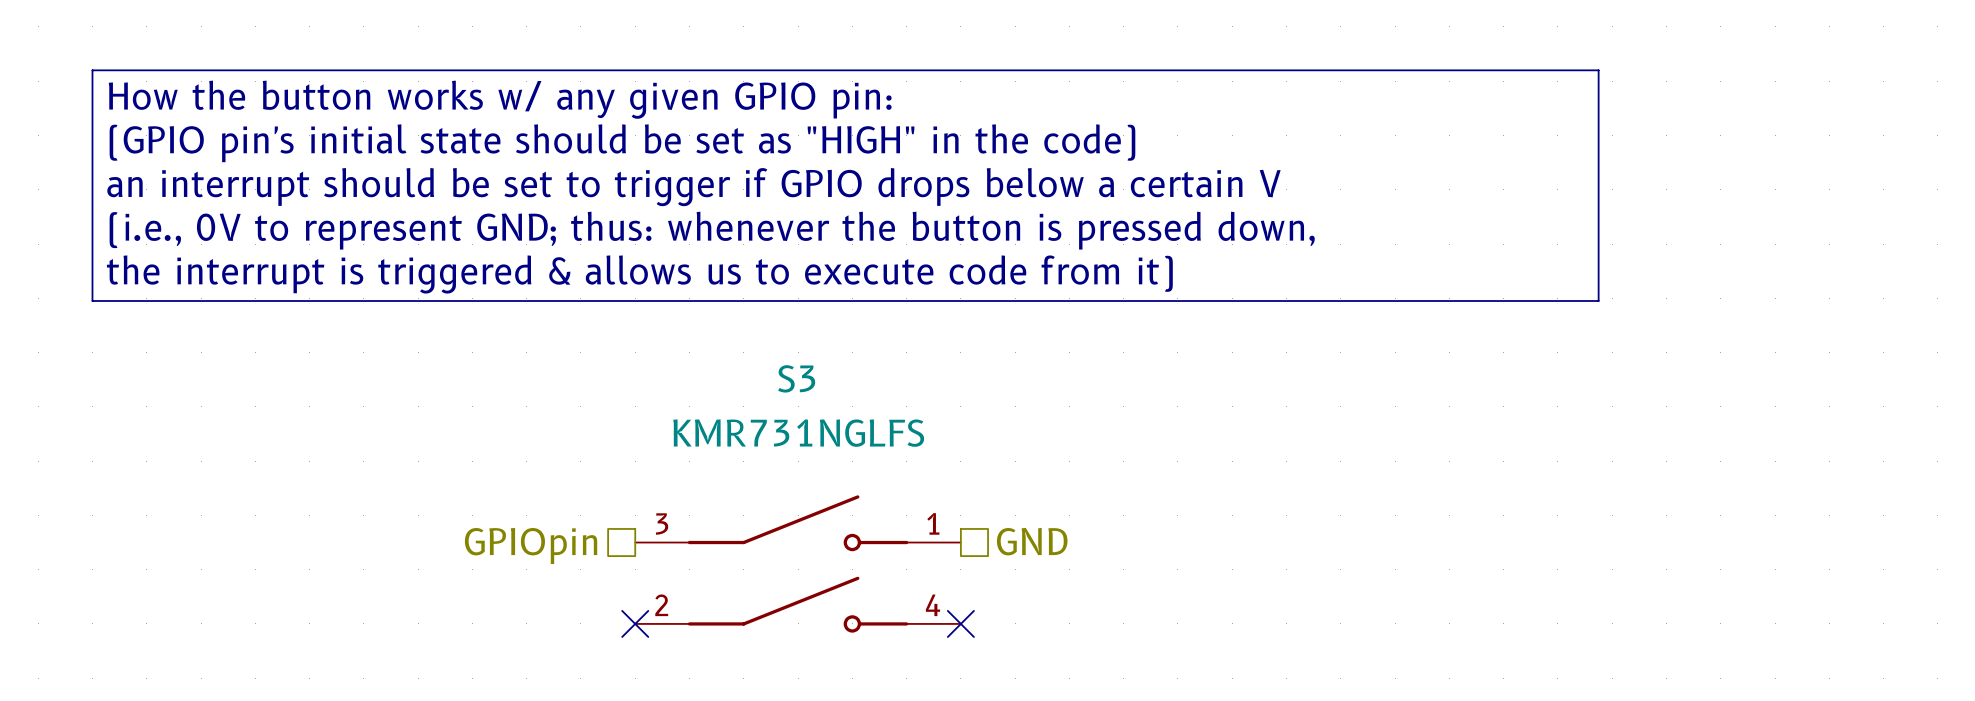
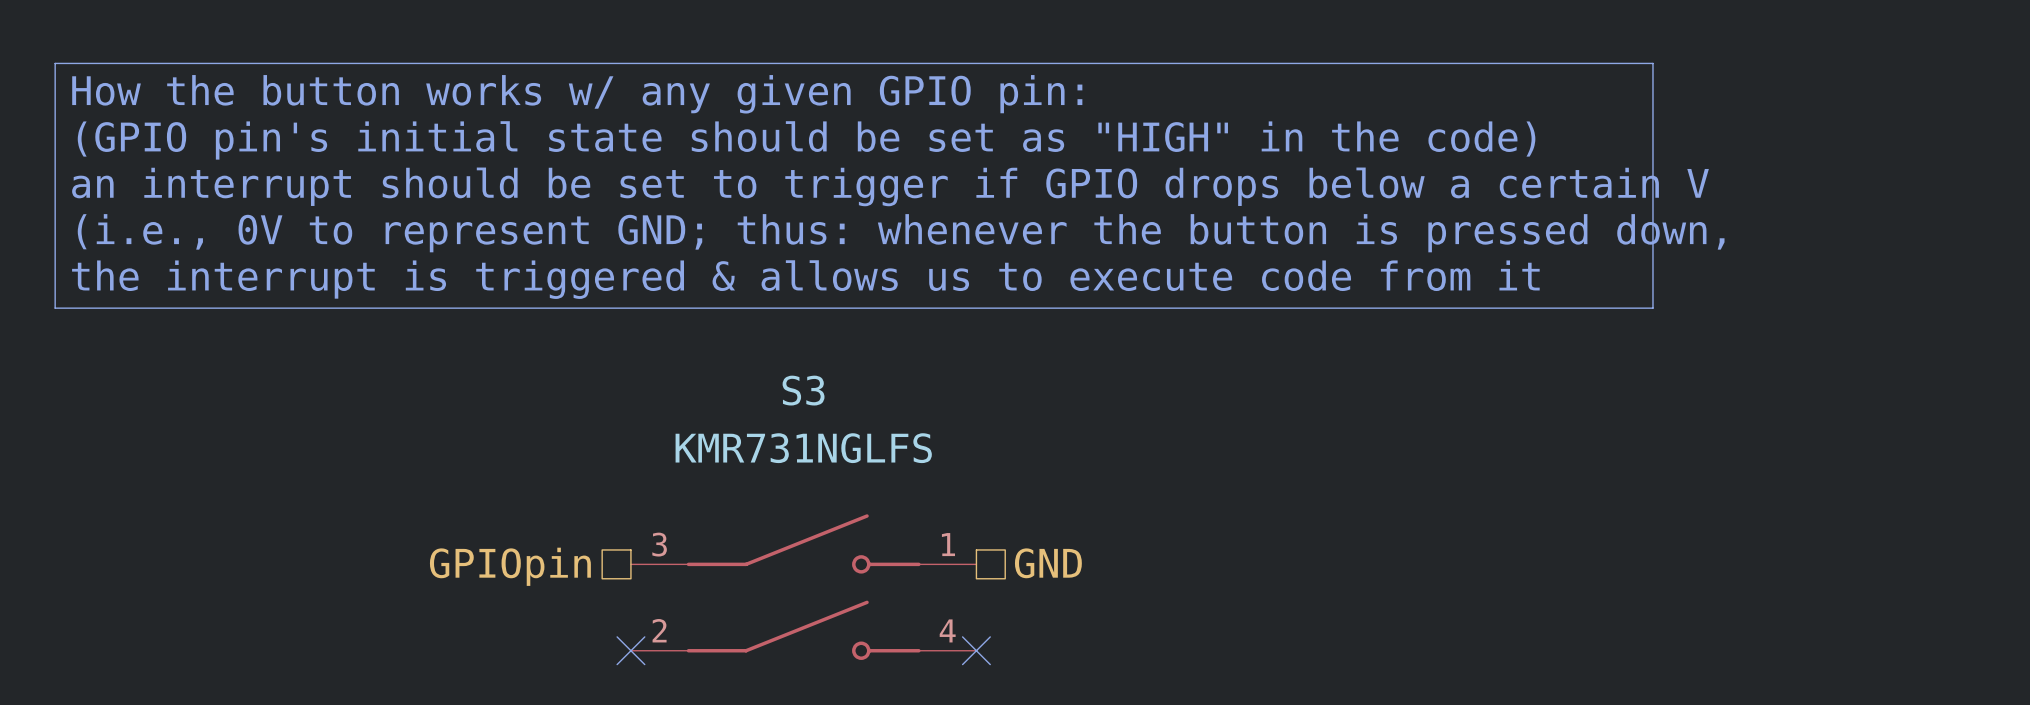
text: the interrupt is triggered & allows us to execute code from it) (639, 274) -> the interrupt is triggered & allows us to execute code from it (805, 279)

